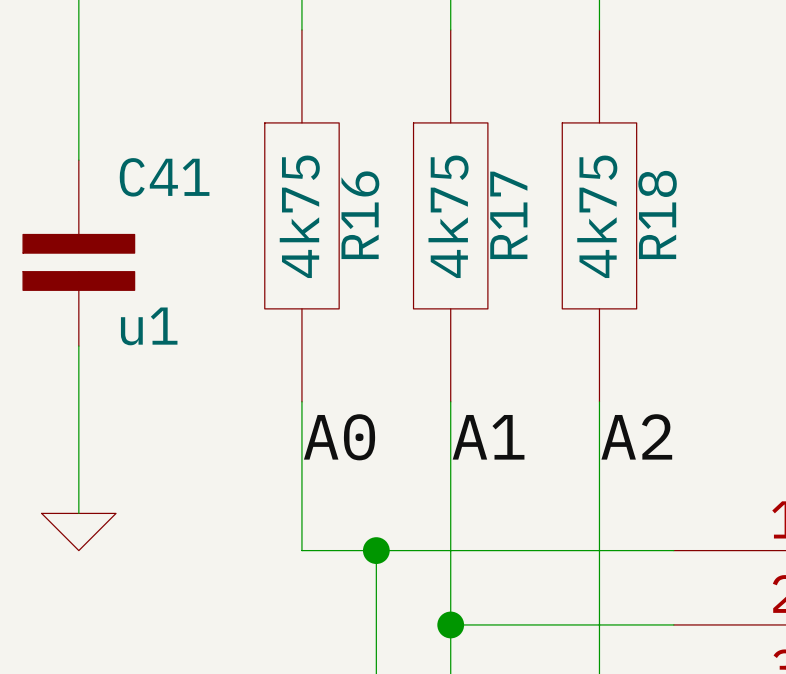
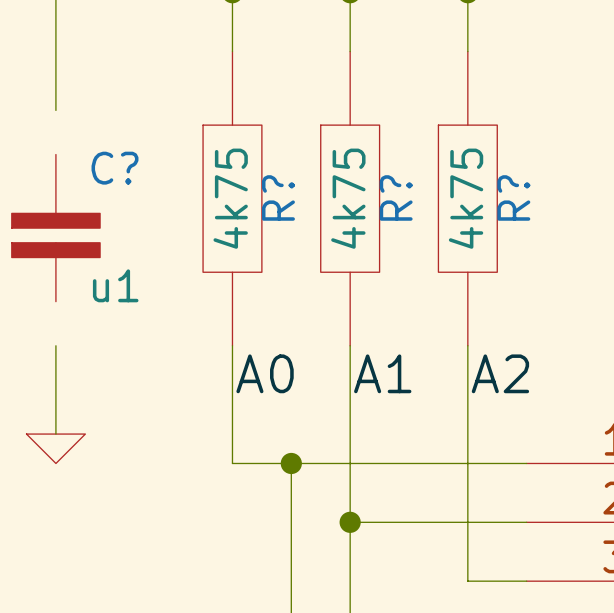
wire: (78, 104) (78, 160) -> none
C41 name: C41 (164, 177) -> C? (115, 168)
R18 name: R18 (657, 214) -> R? (513, 197)
R16 name: R16 (360, 215) -> R? (278, 197)
R17 name: R17 (508, 215) -> R? (396, 197)
wire: (78, 346) (78, 401) -> none

